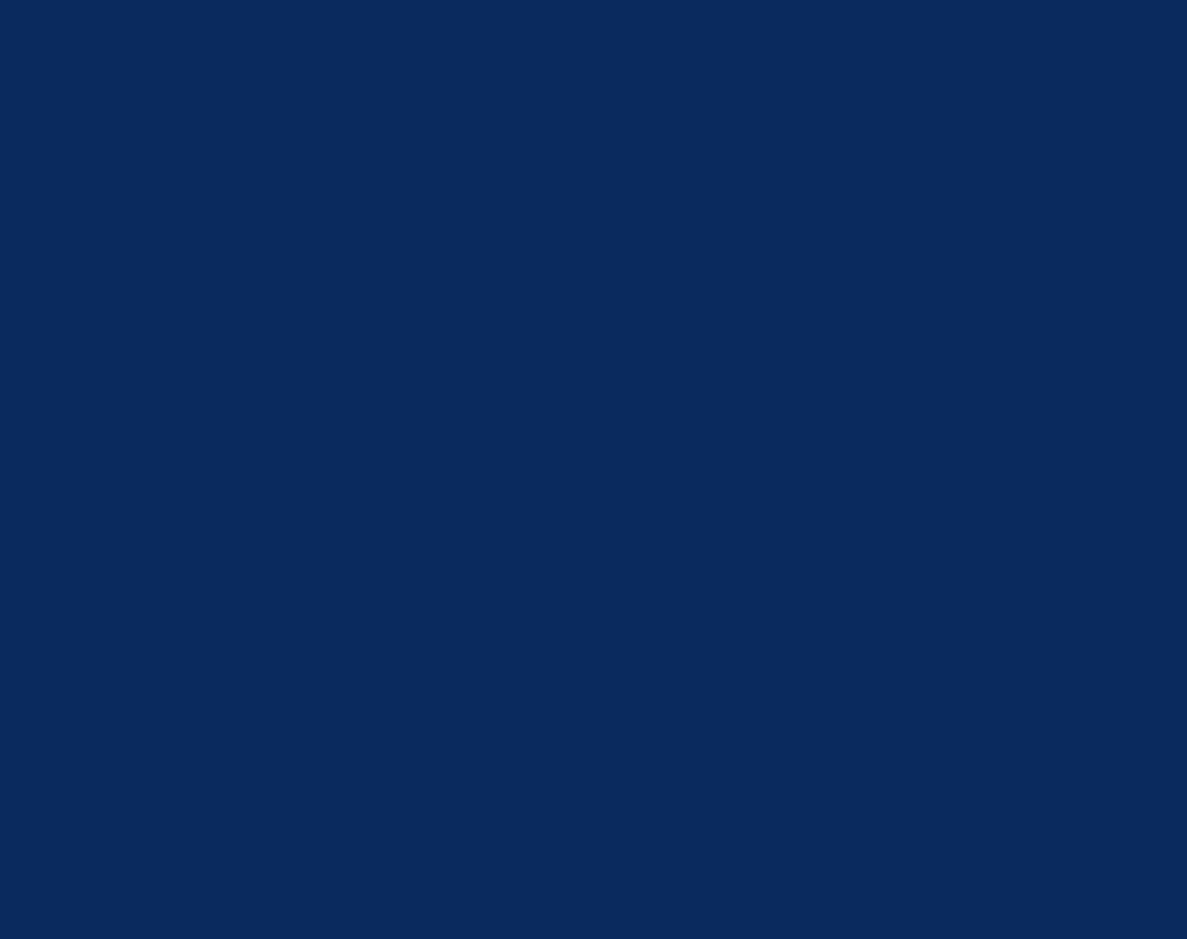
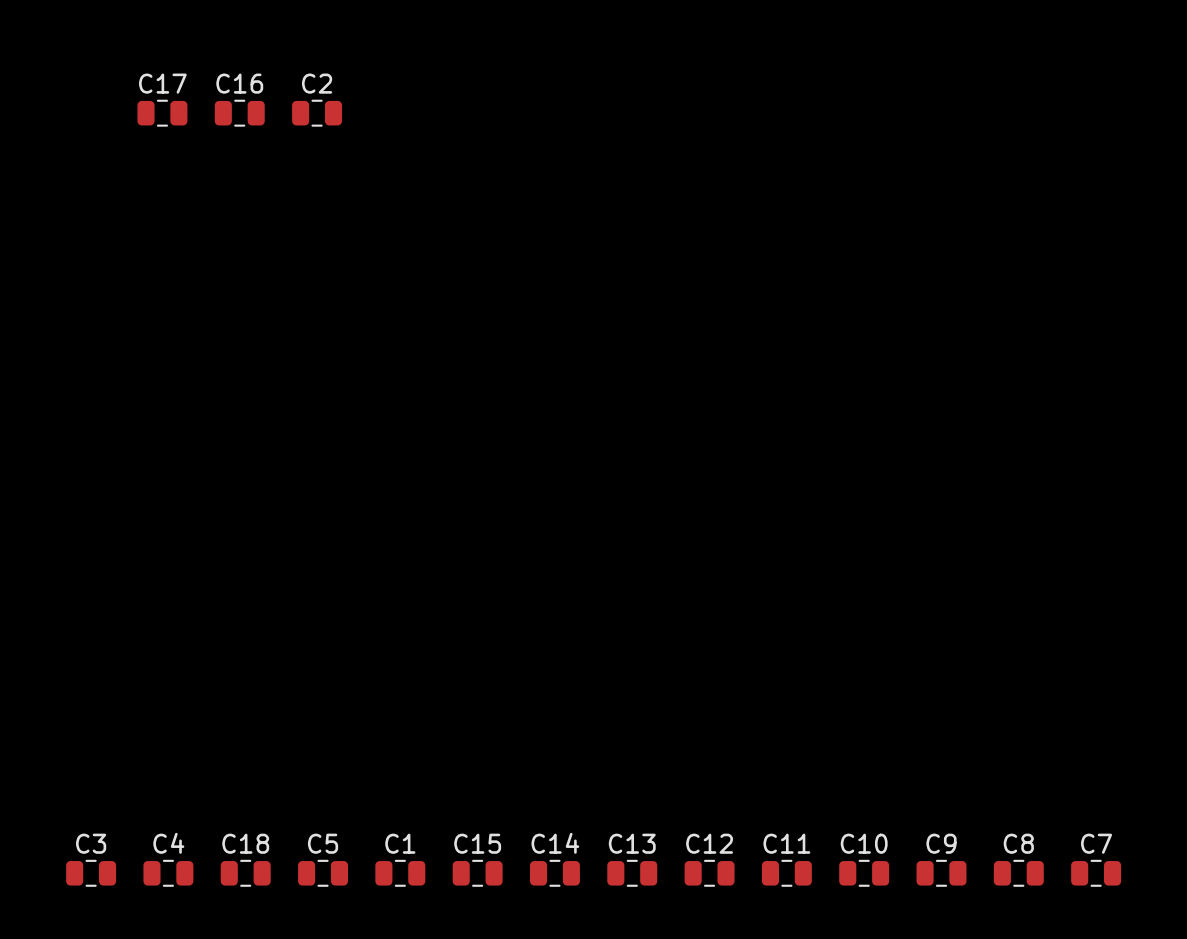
C17: none -> (162, 113)
C16: none -> (239, 113)
C2: none -> (317, 113)
C3: none -> (91, 873)
C4: none -> (168, 873)
C18: none -> (245, 873)
C5: none -> (323, 873)
C1: none -> (400, 873)
C15: none -> (477, 873)
C14: none -> (554, 873)
C13: none -> (632, 873)
C12: none -> (709, 873)
C11: none -> (786, 873)
C10: none -> (864, 873)
C9: none -> (941, 873)
C8: none -> (1018, 873)
C7: none -> (1096, 873)

